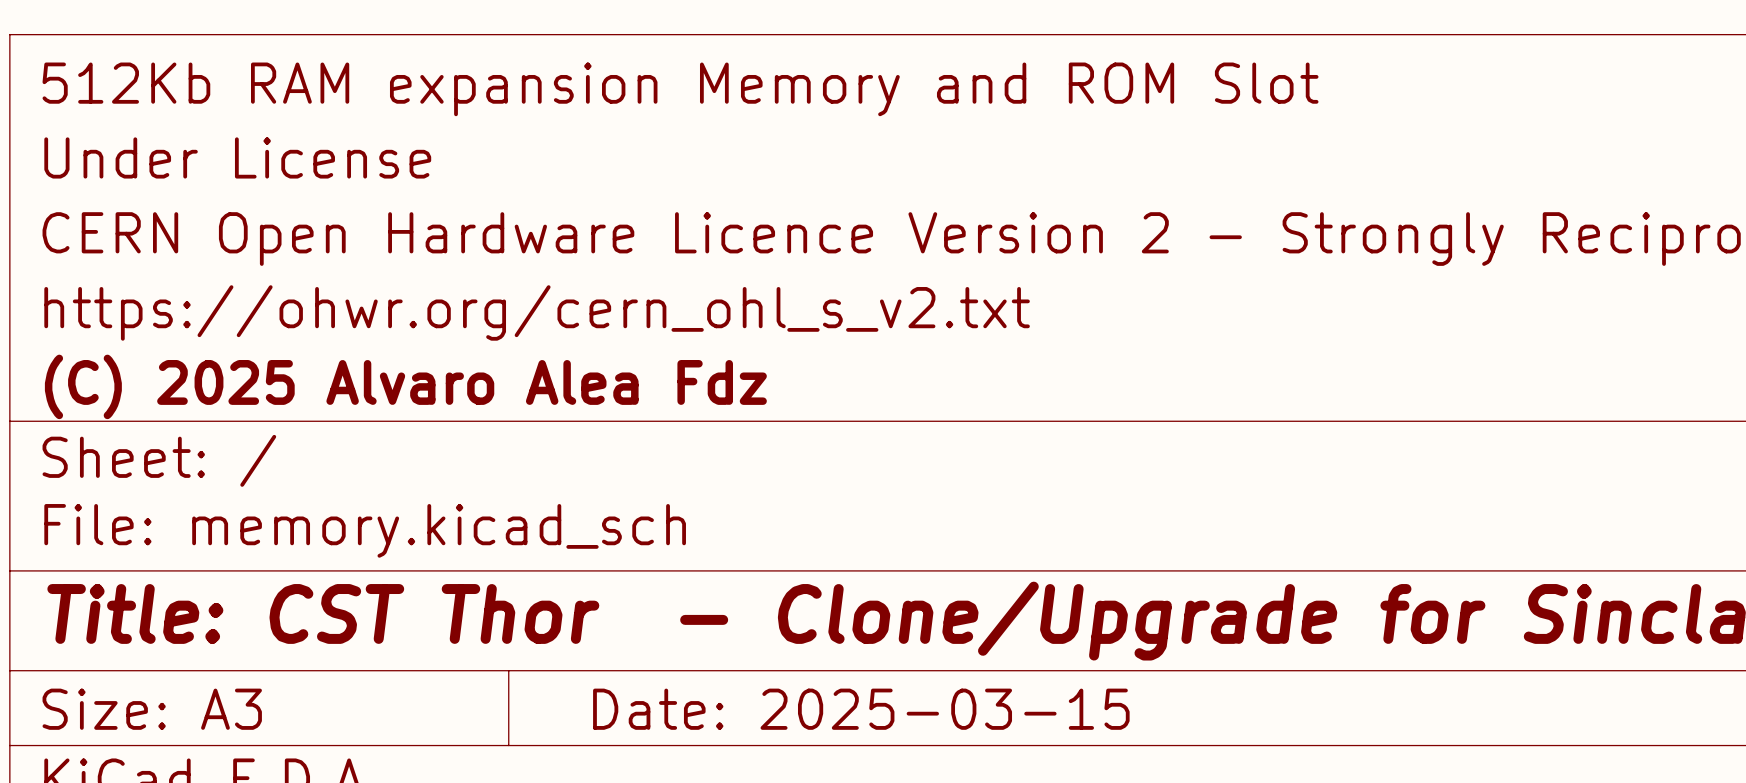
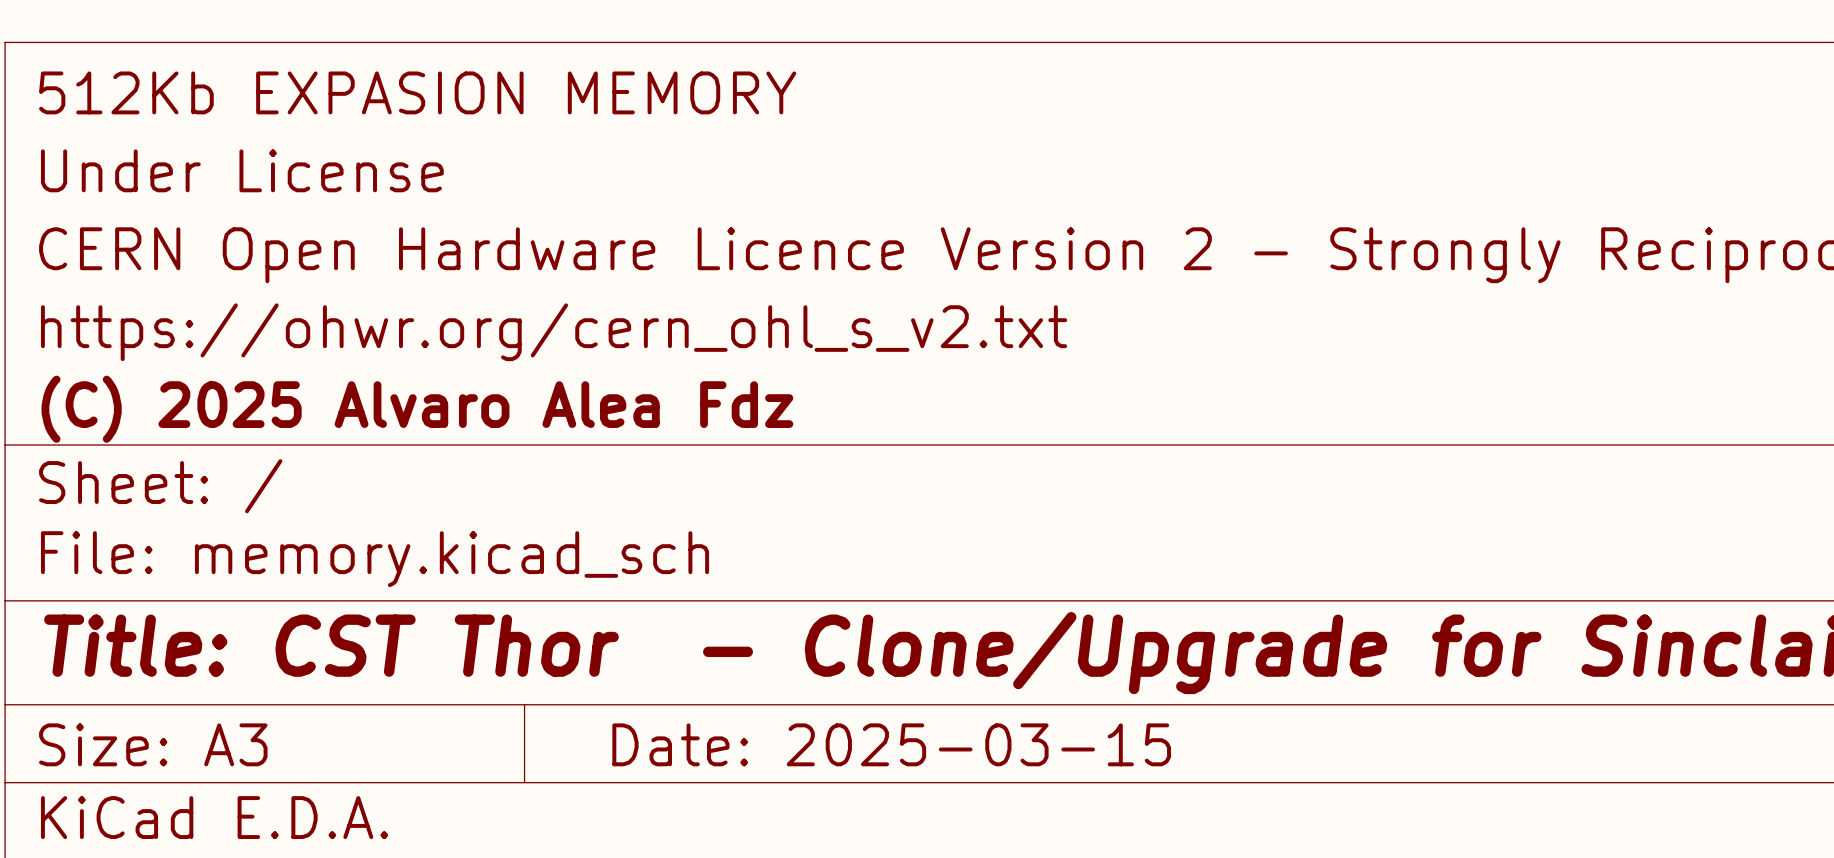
title block: 512Kb RAM expansion Memory and ROM Slot (680, 89) -> 512Kb EXPASION MEMORY (417, 92)

